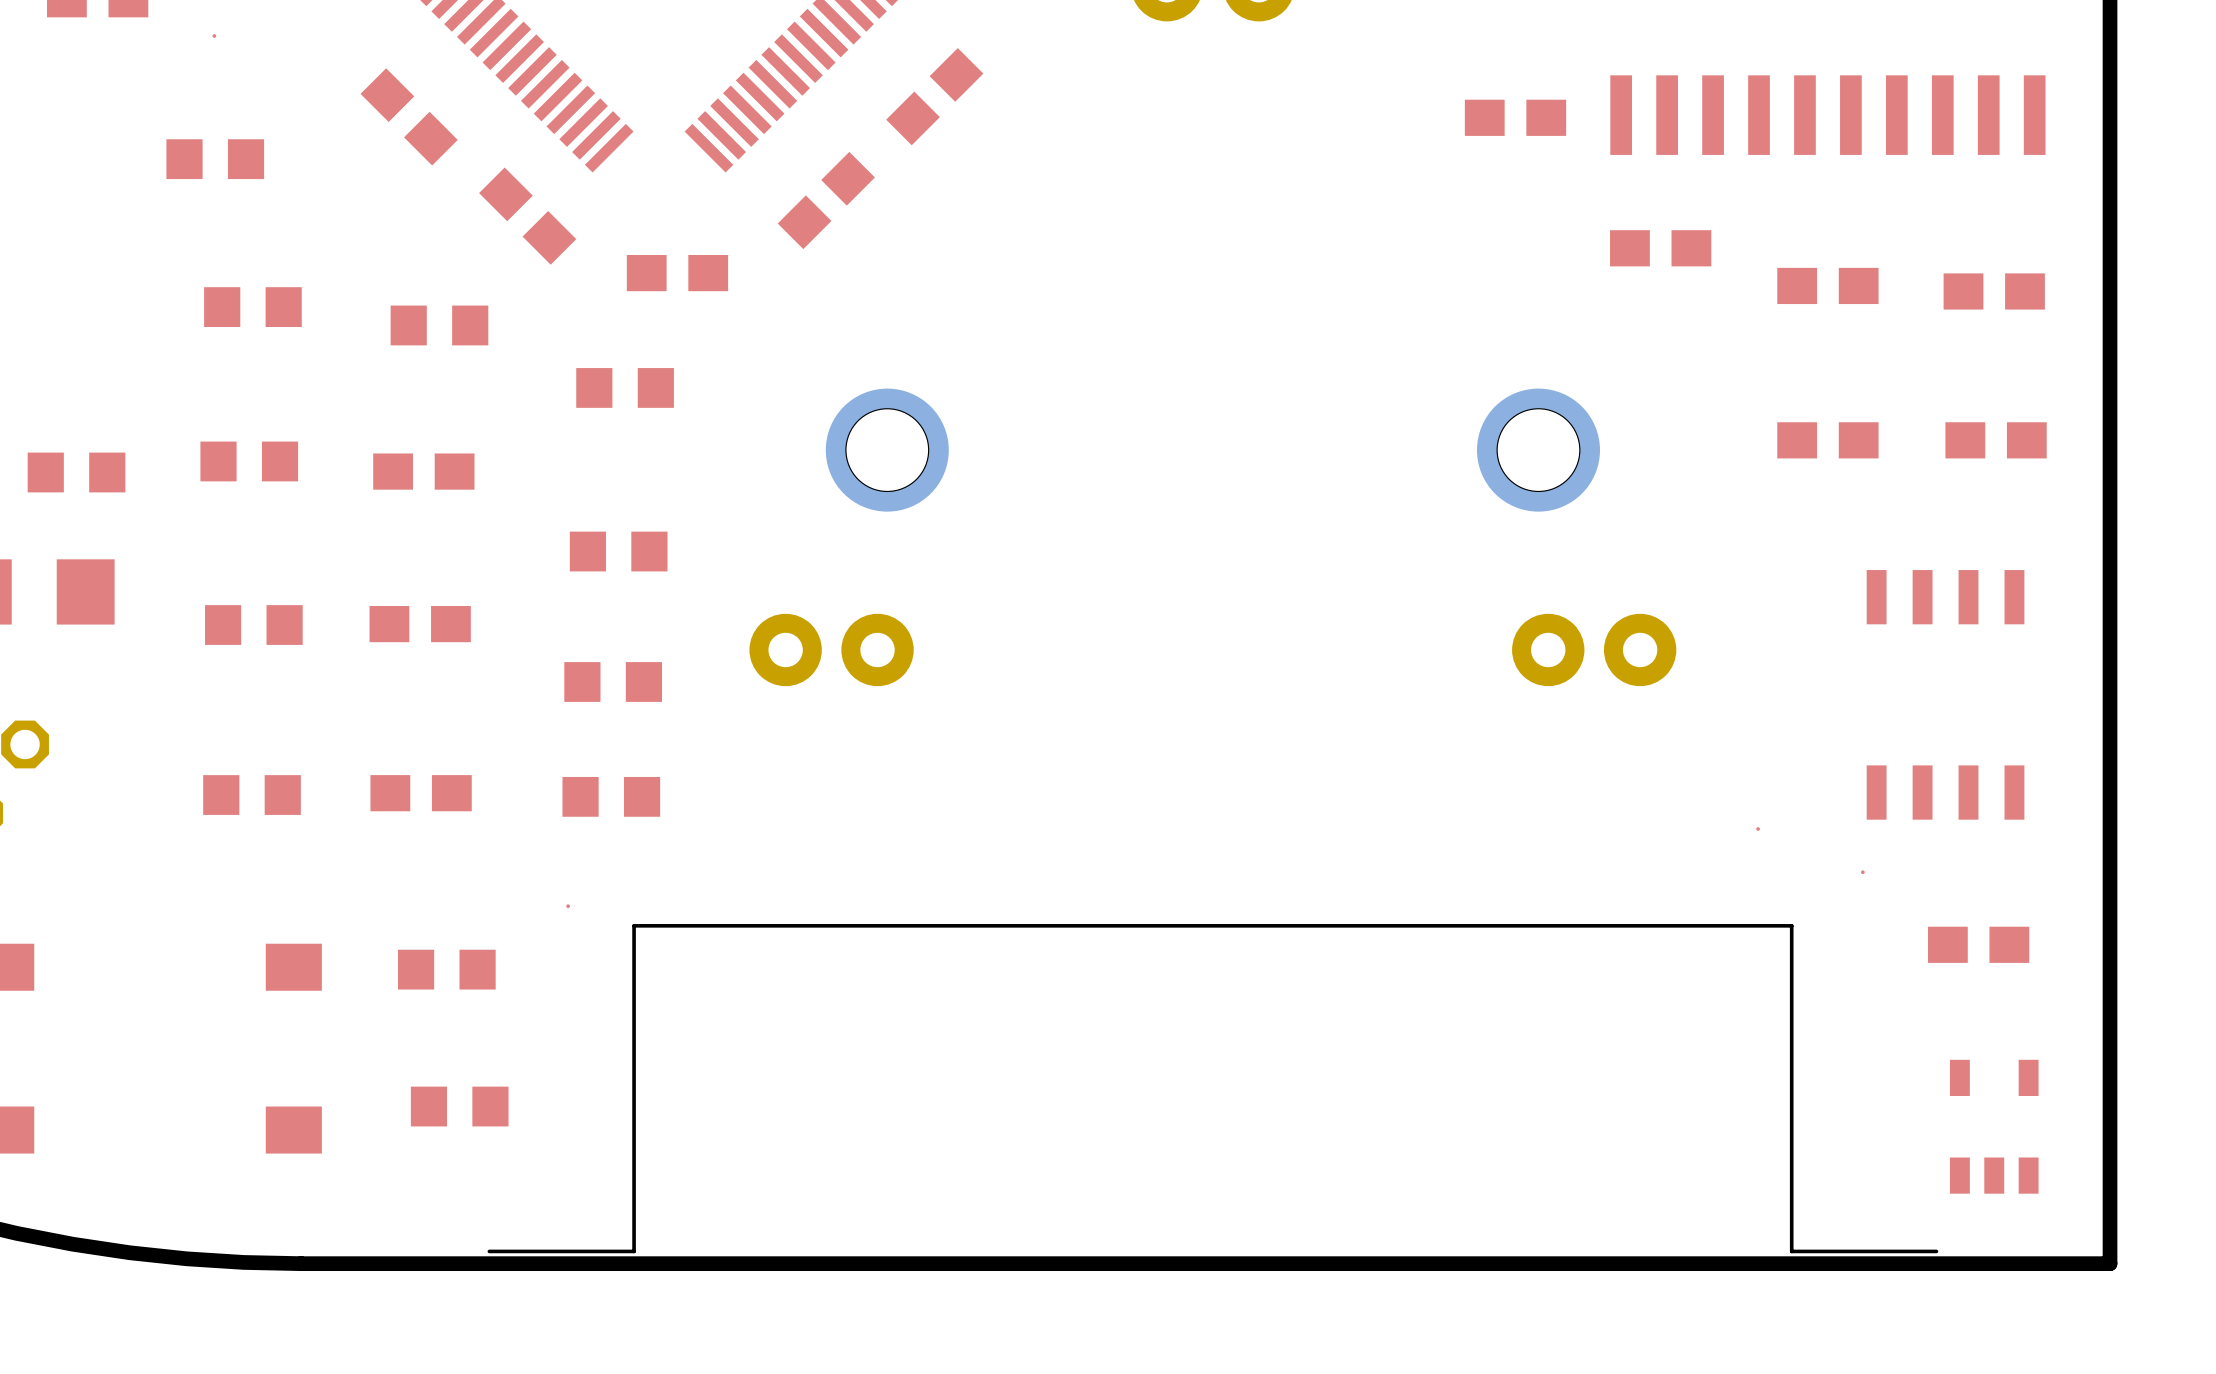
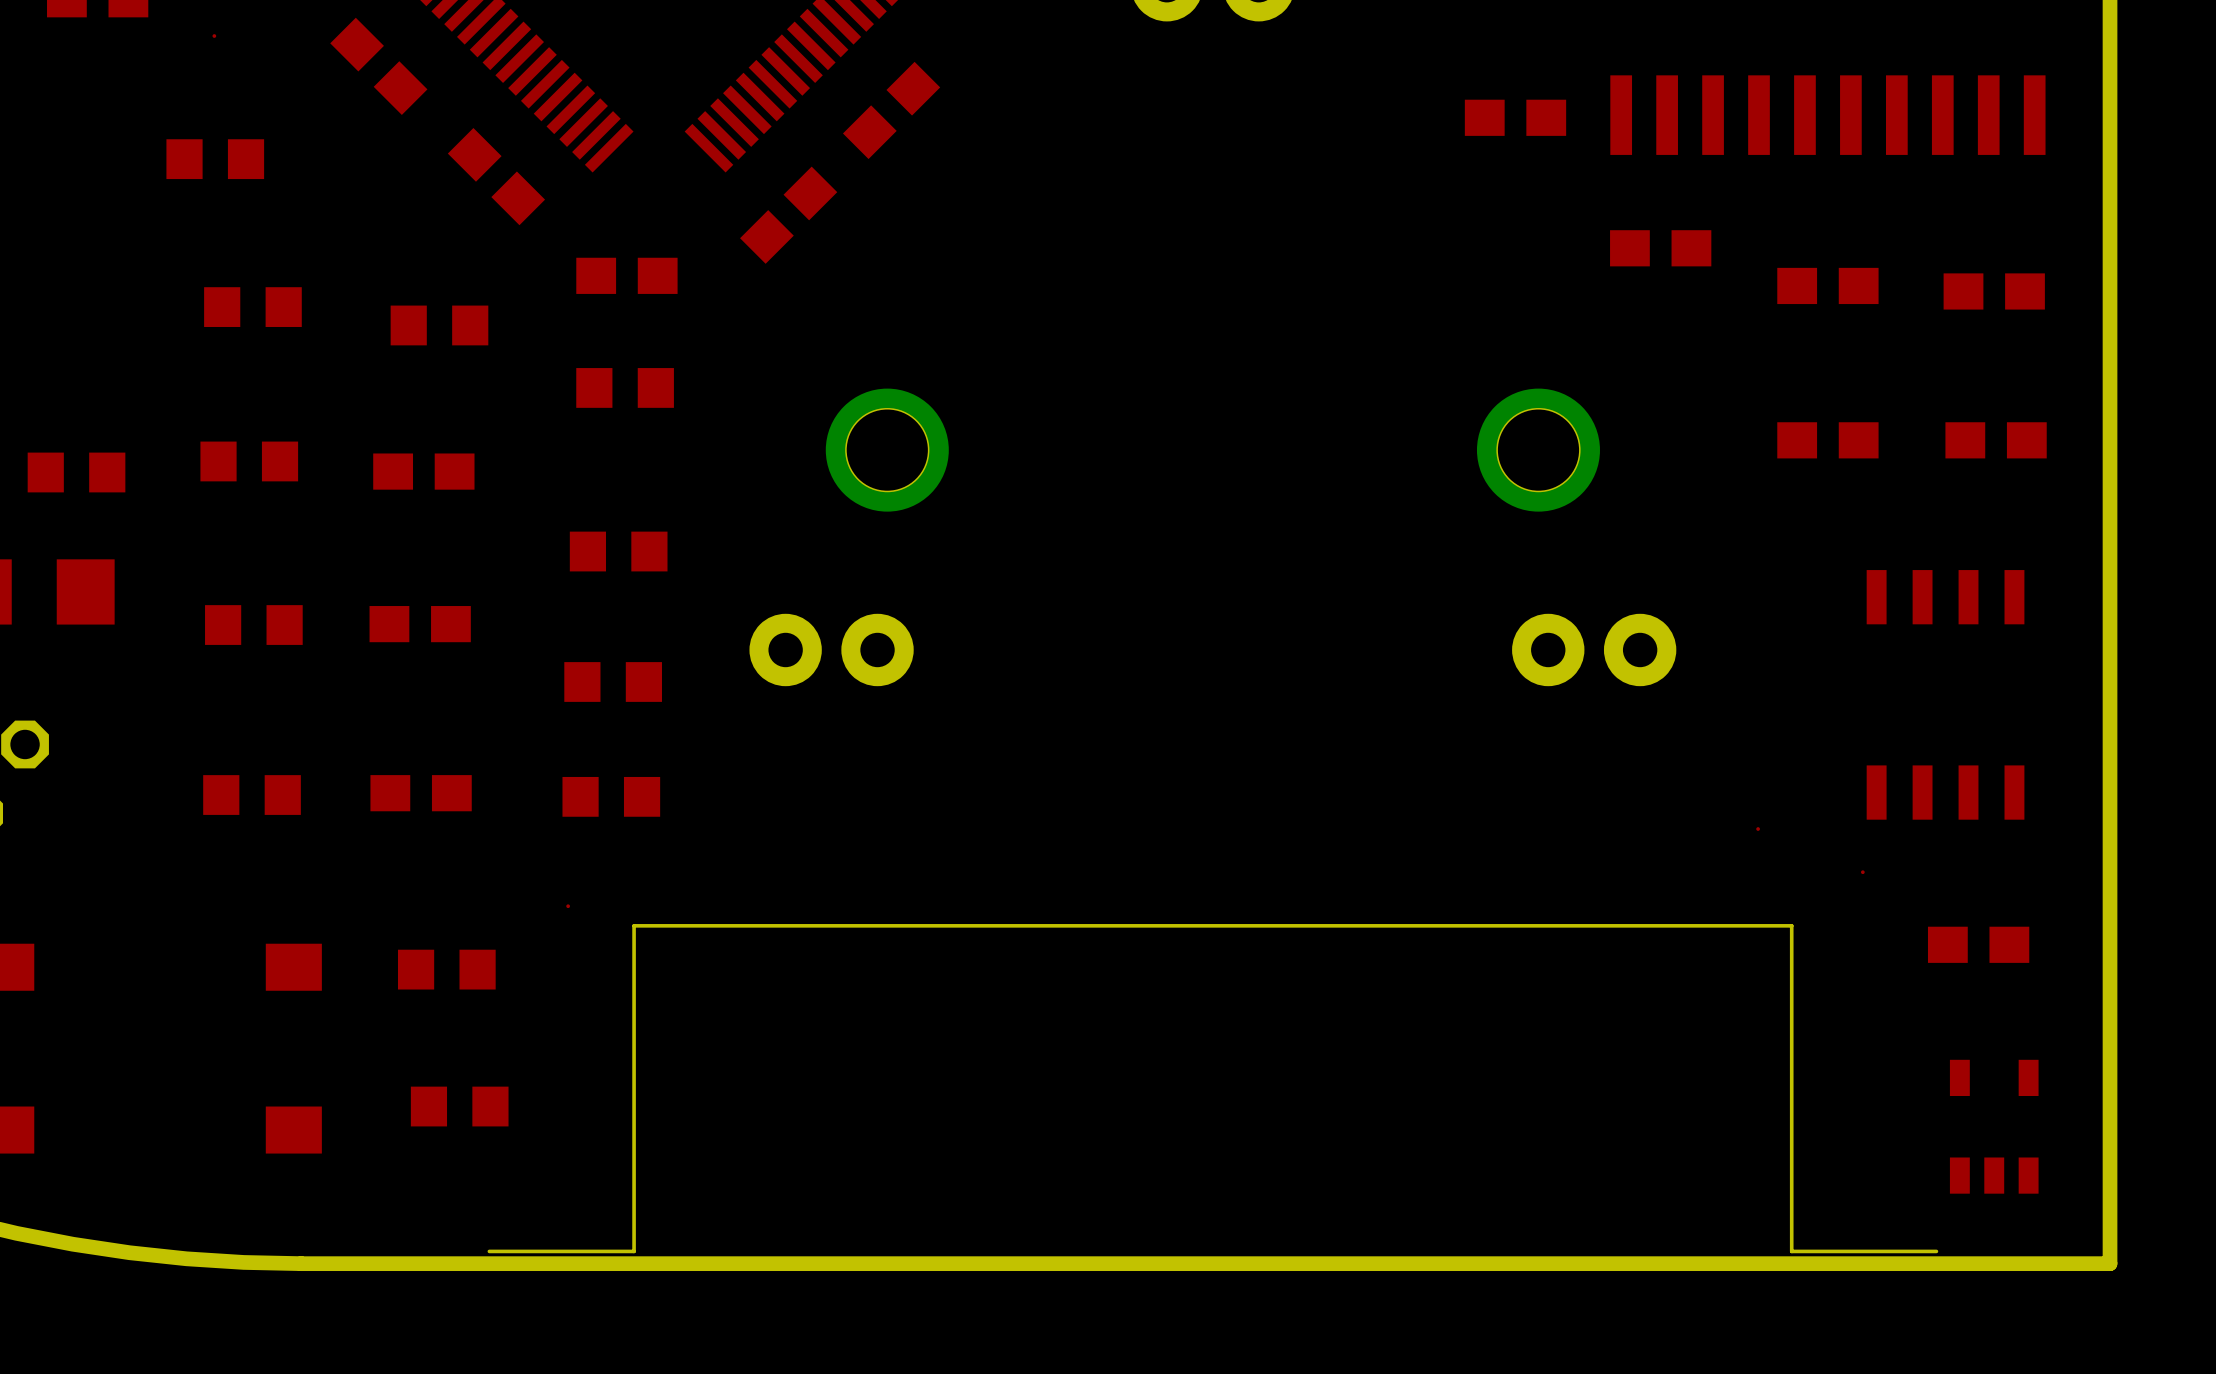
part: none -> (378, 66)
part position: (934, 96) -> (891, 110)
part: (409, 116) -> none
part position: (826, 200) -> (788, 215)
part position: (527, 216) -> (496, 176)
part position: (677, 273) -> (626, 275)

